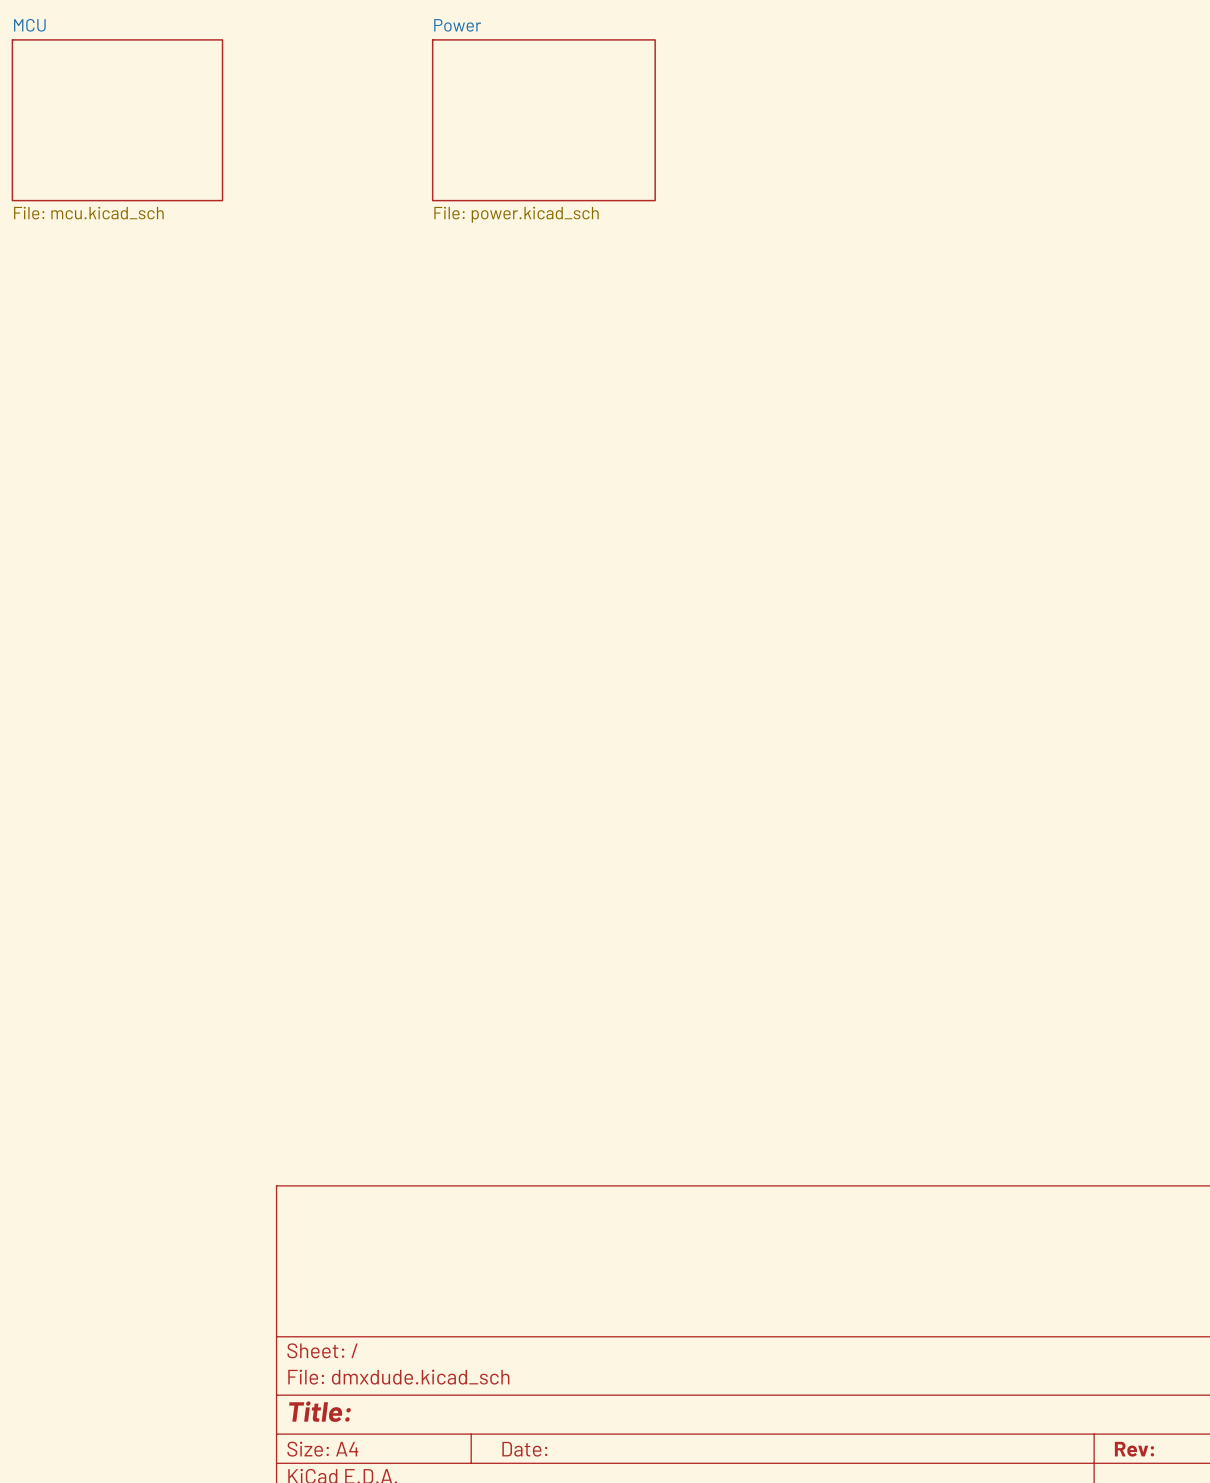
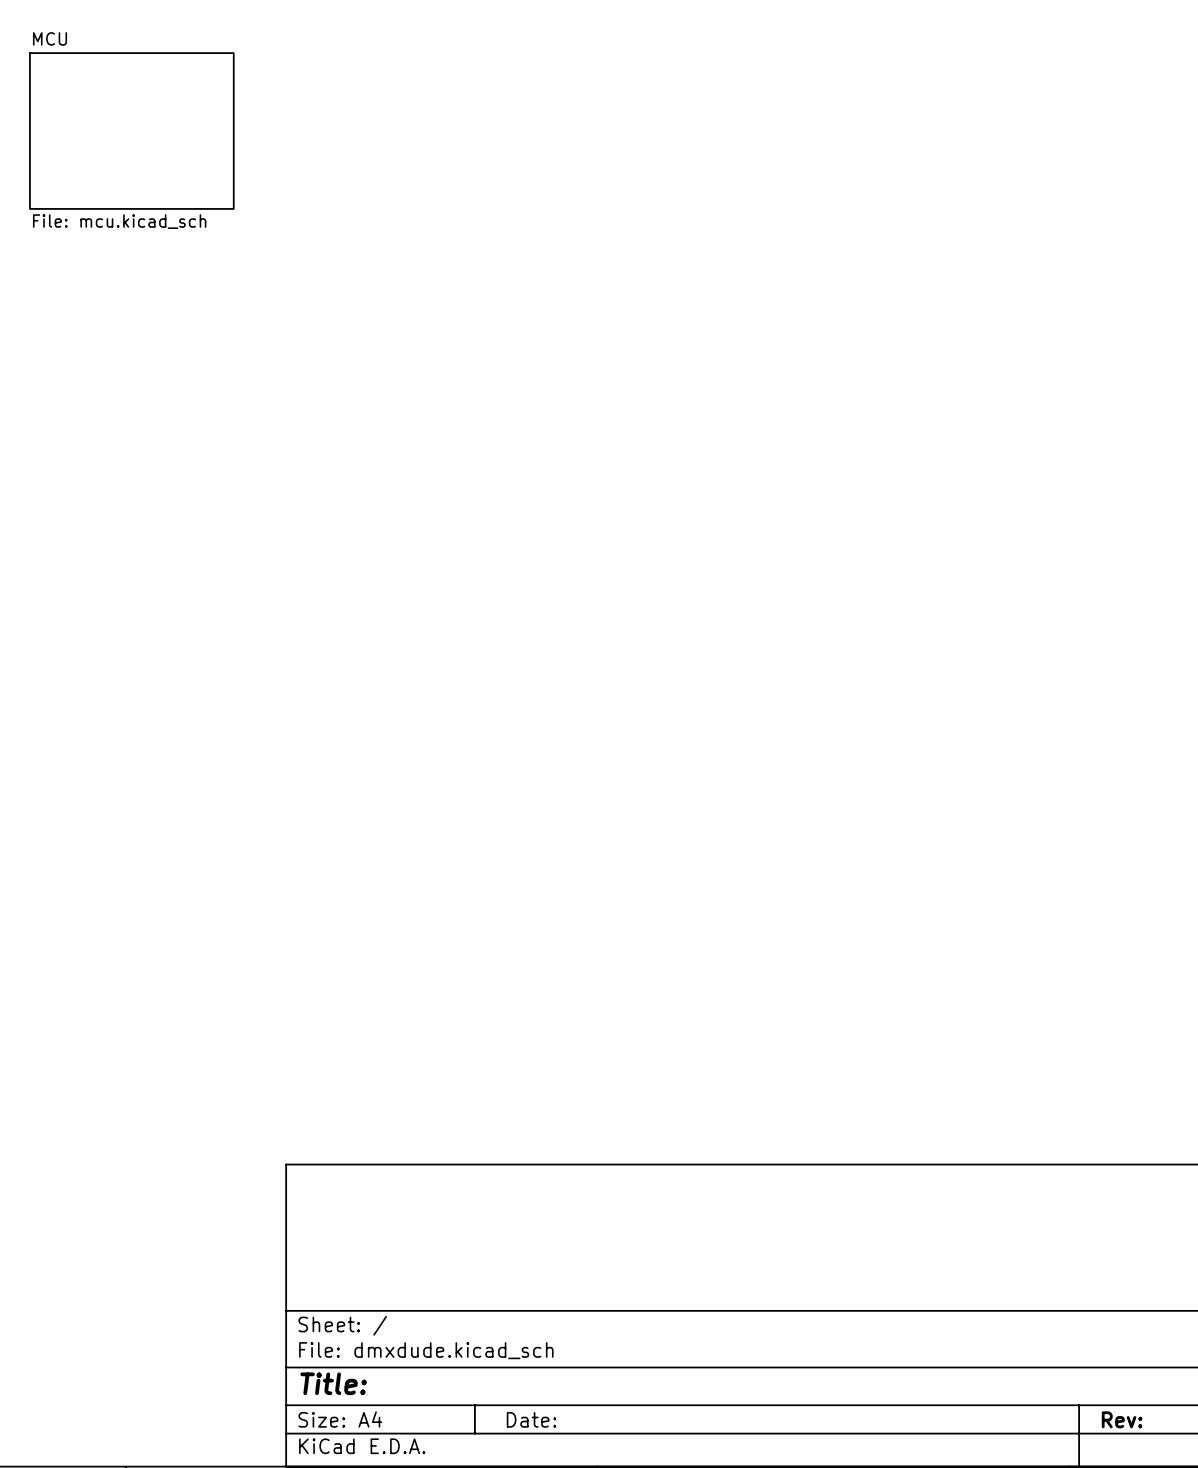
sheet Power: File: power.kicad_sch (543, 120) -> none

